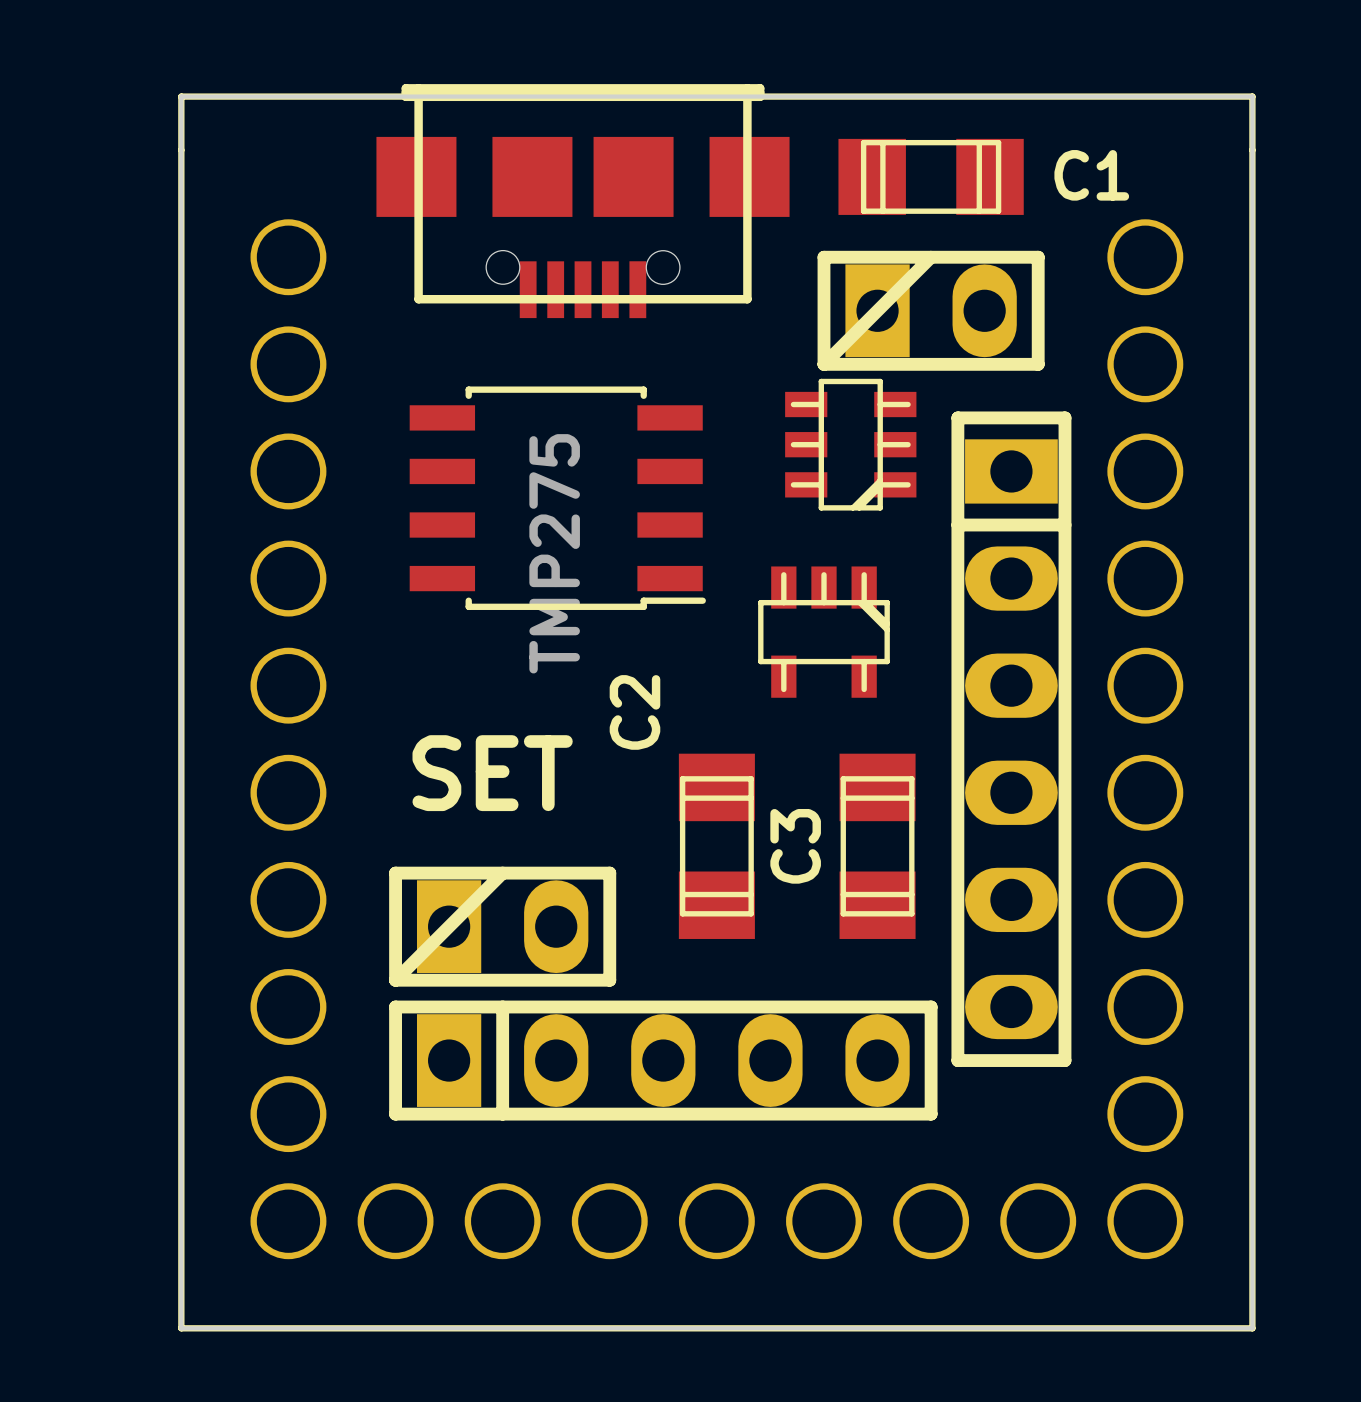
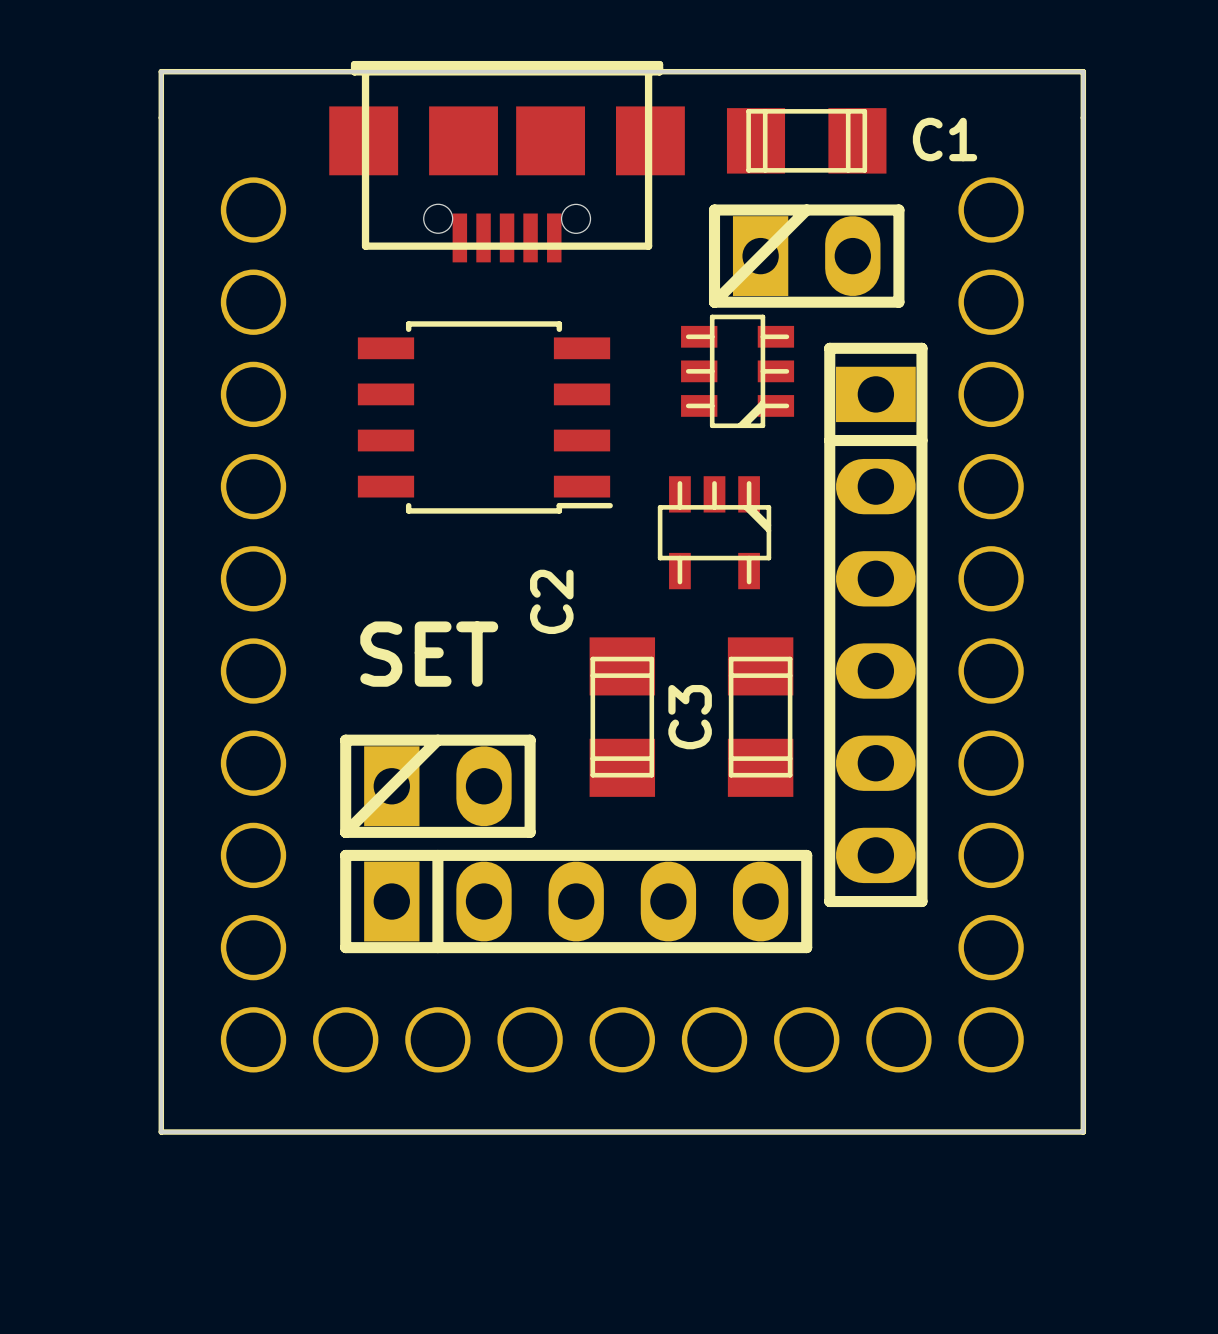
part value: TMP275 (554, 553) -> none

